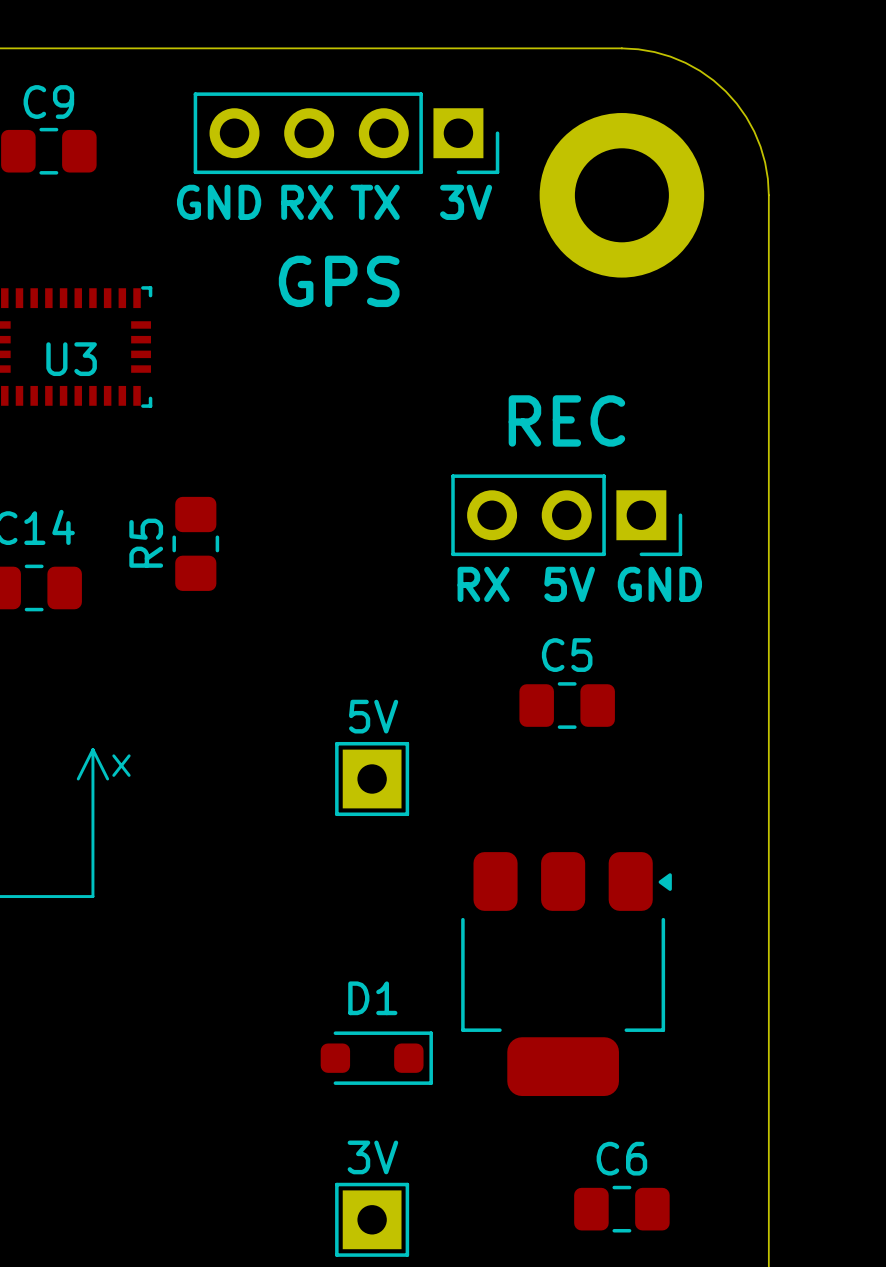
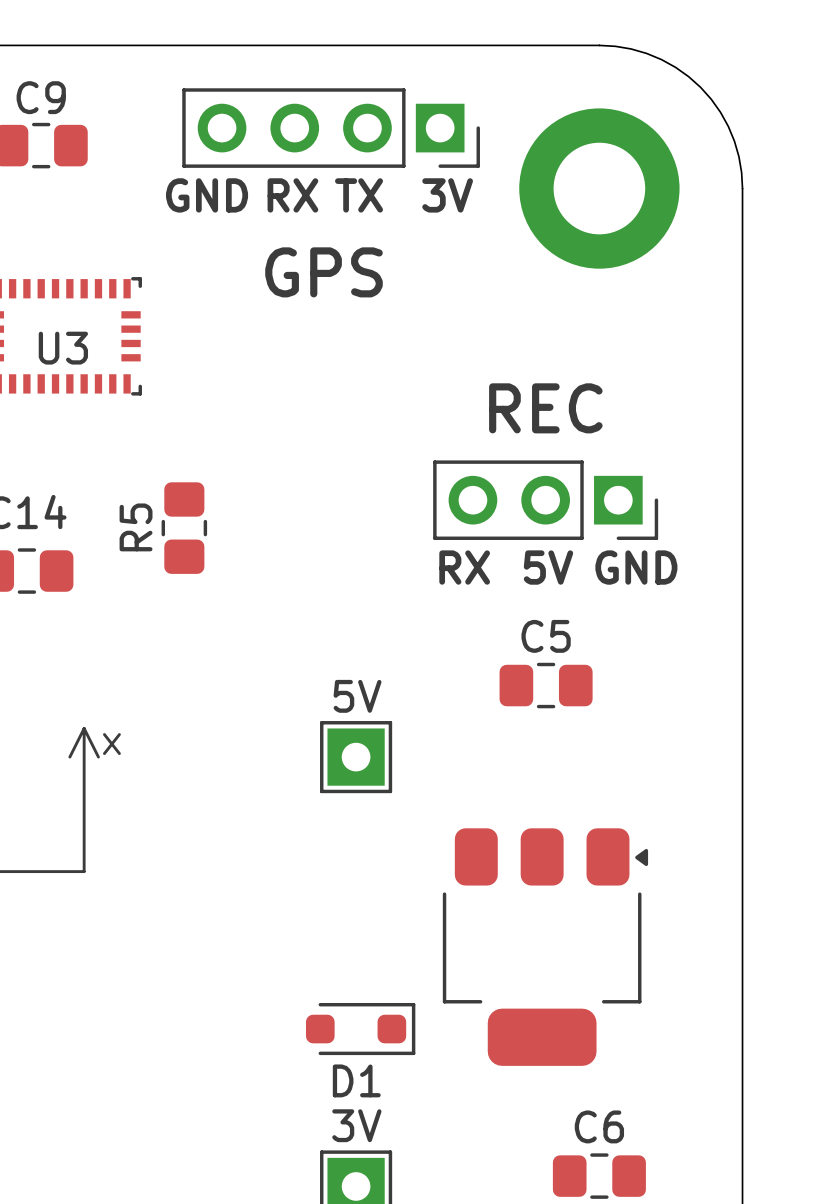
D1 name position: D1 (372, 998) -> D1 (356, 1080)

